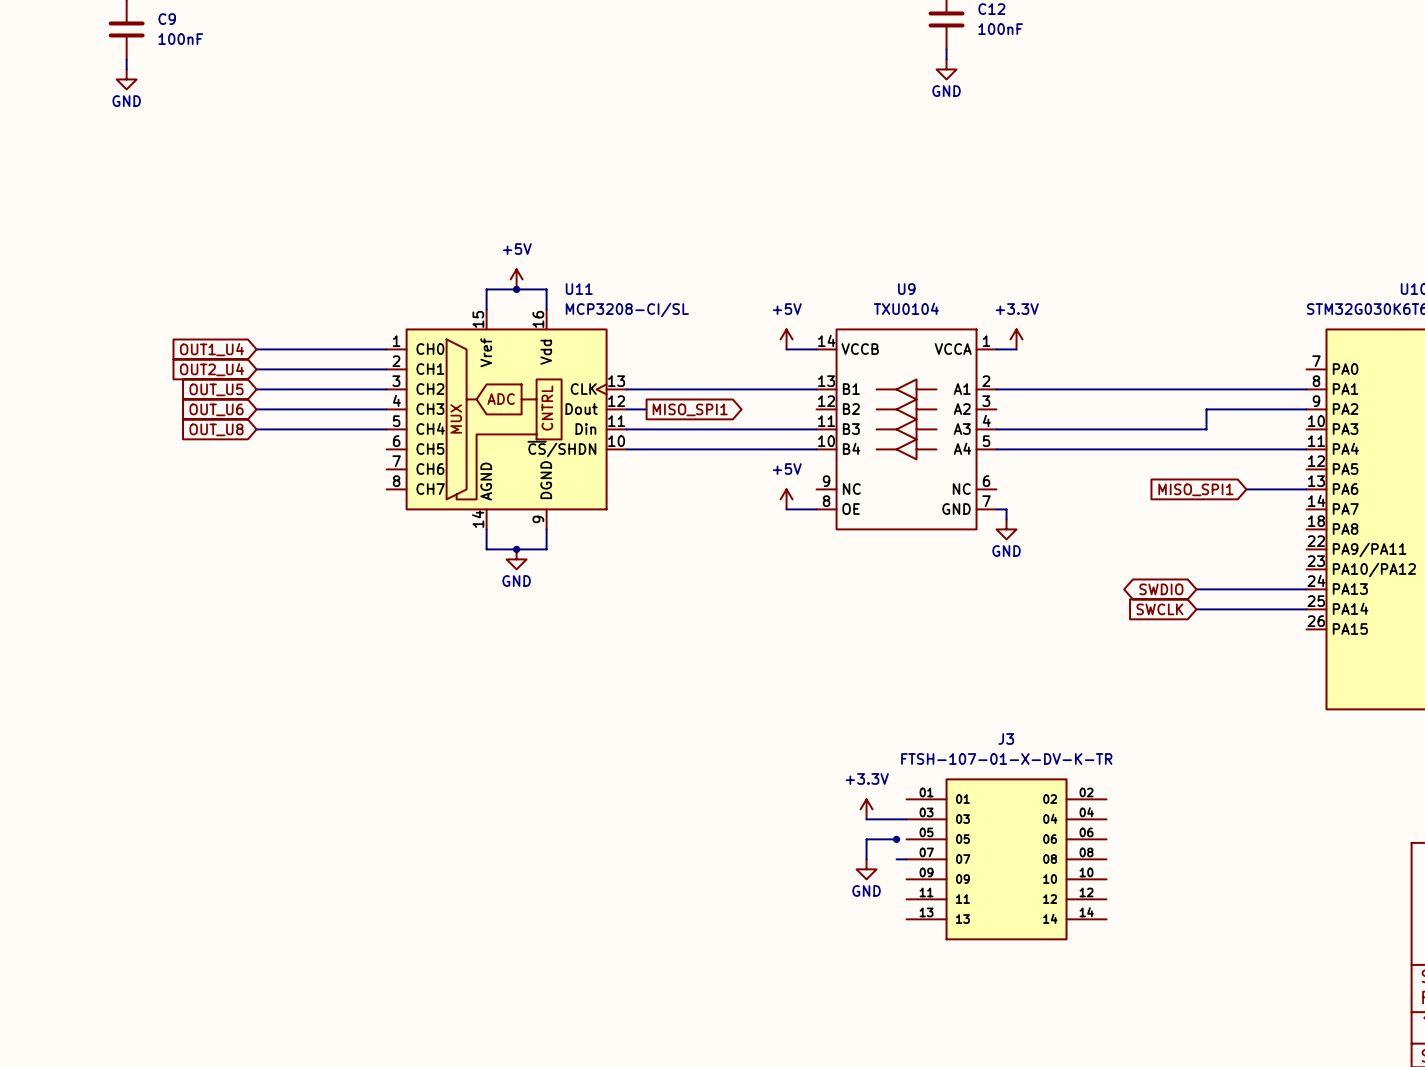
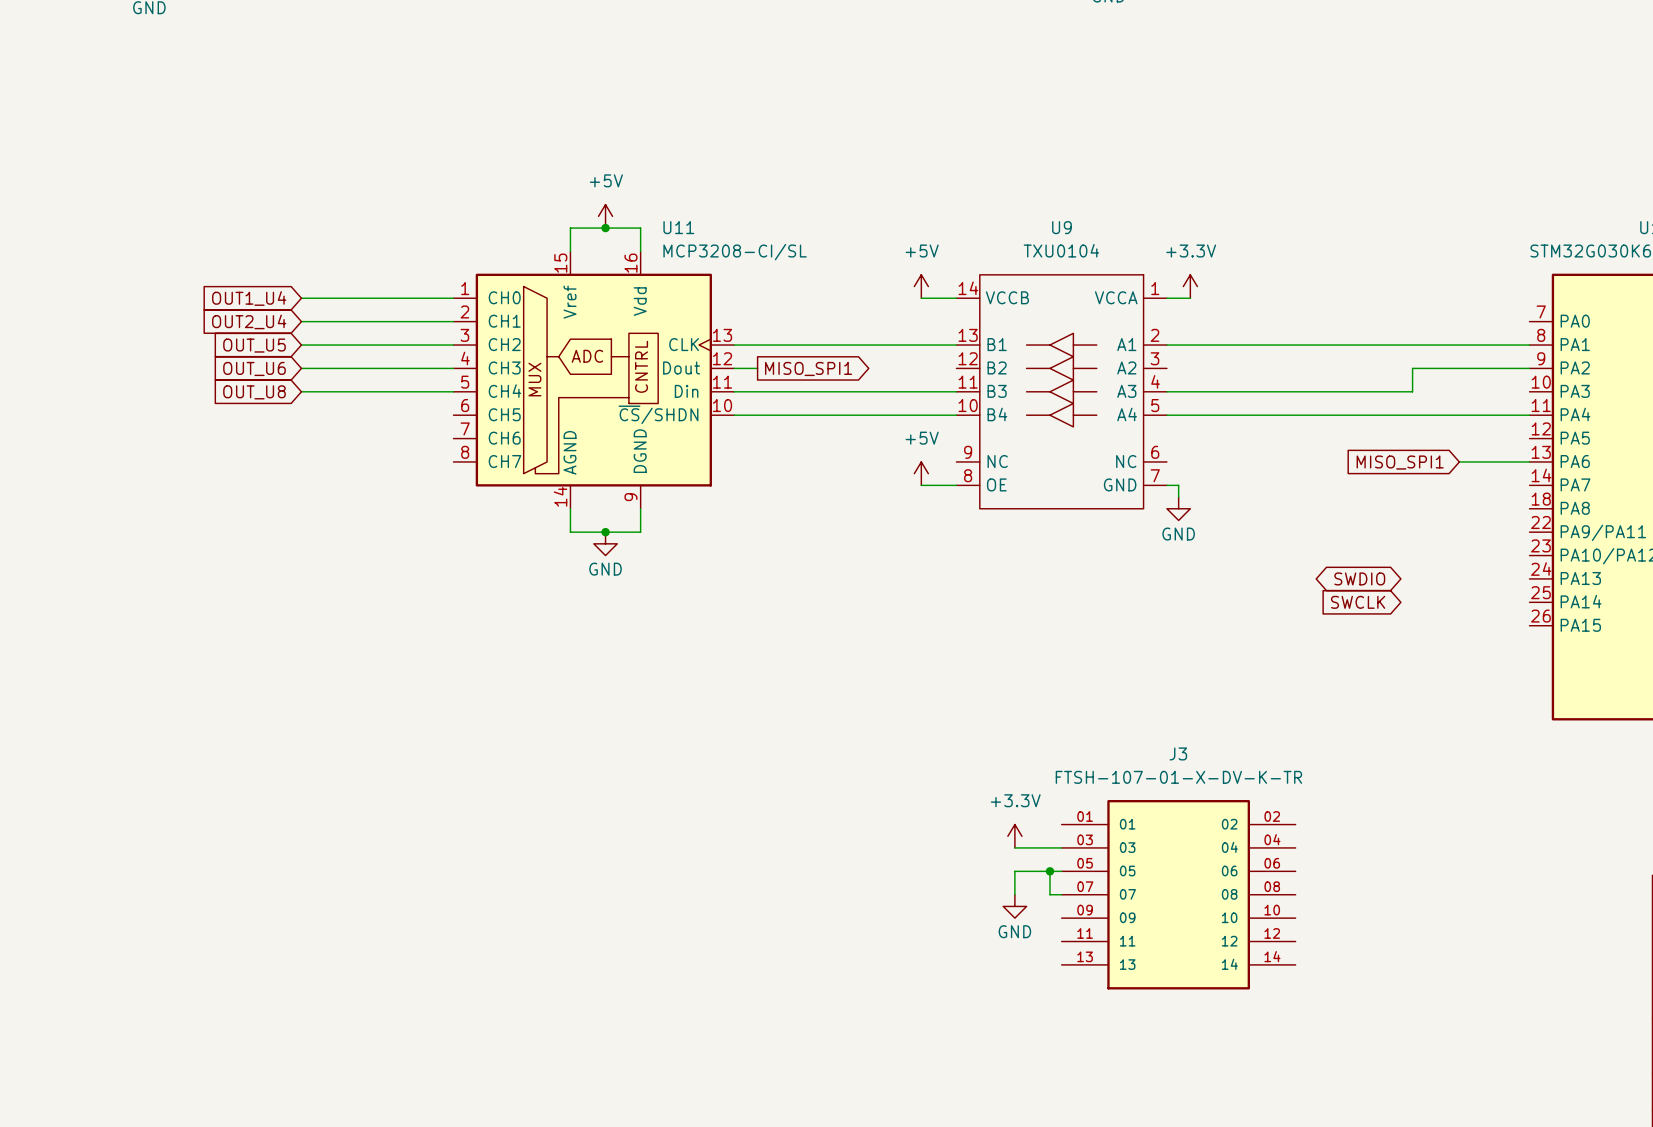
wire: (1196, 589) (1306, 589) -> none
wire: (1196, 609) (1306, 609) -> none
wire: none -> (1061, 871) (1049, 871) (1049, 894)

